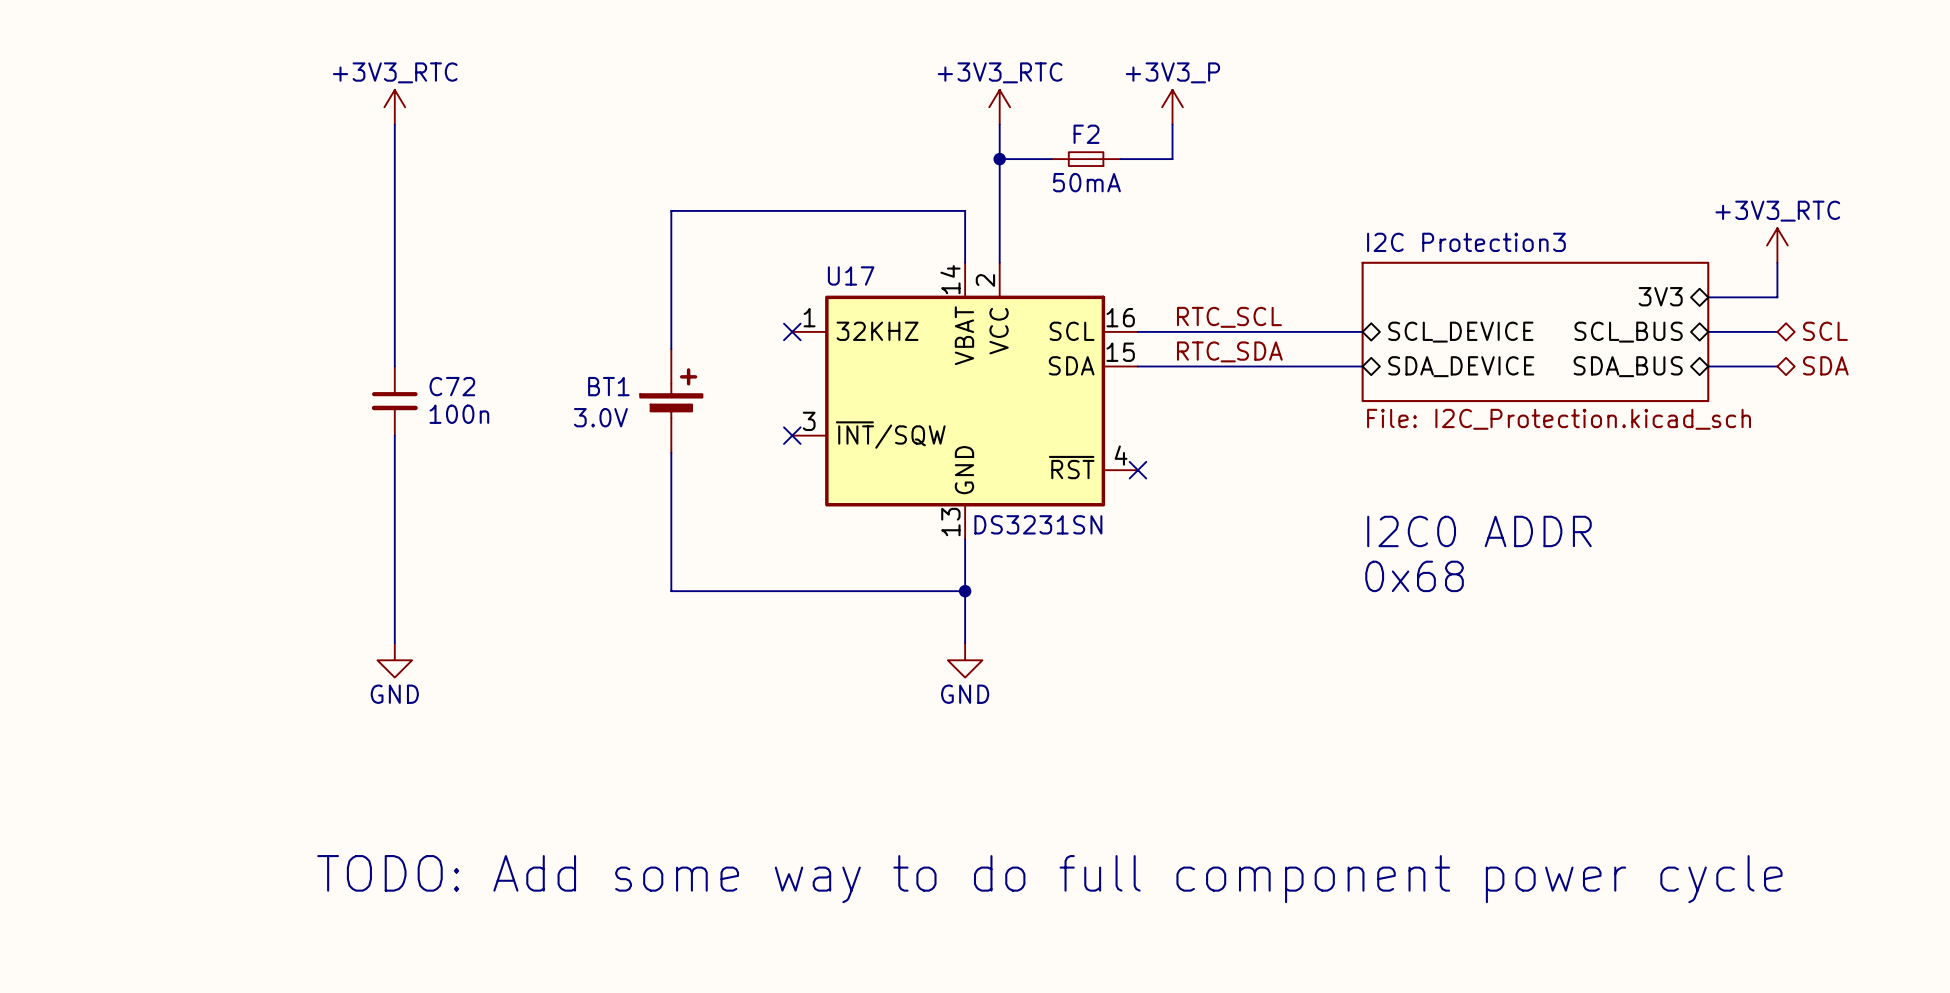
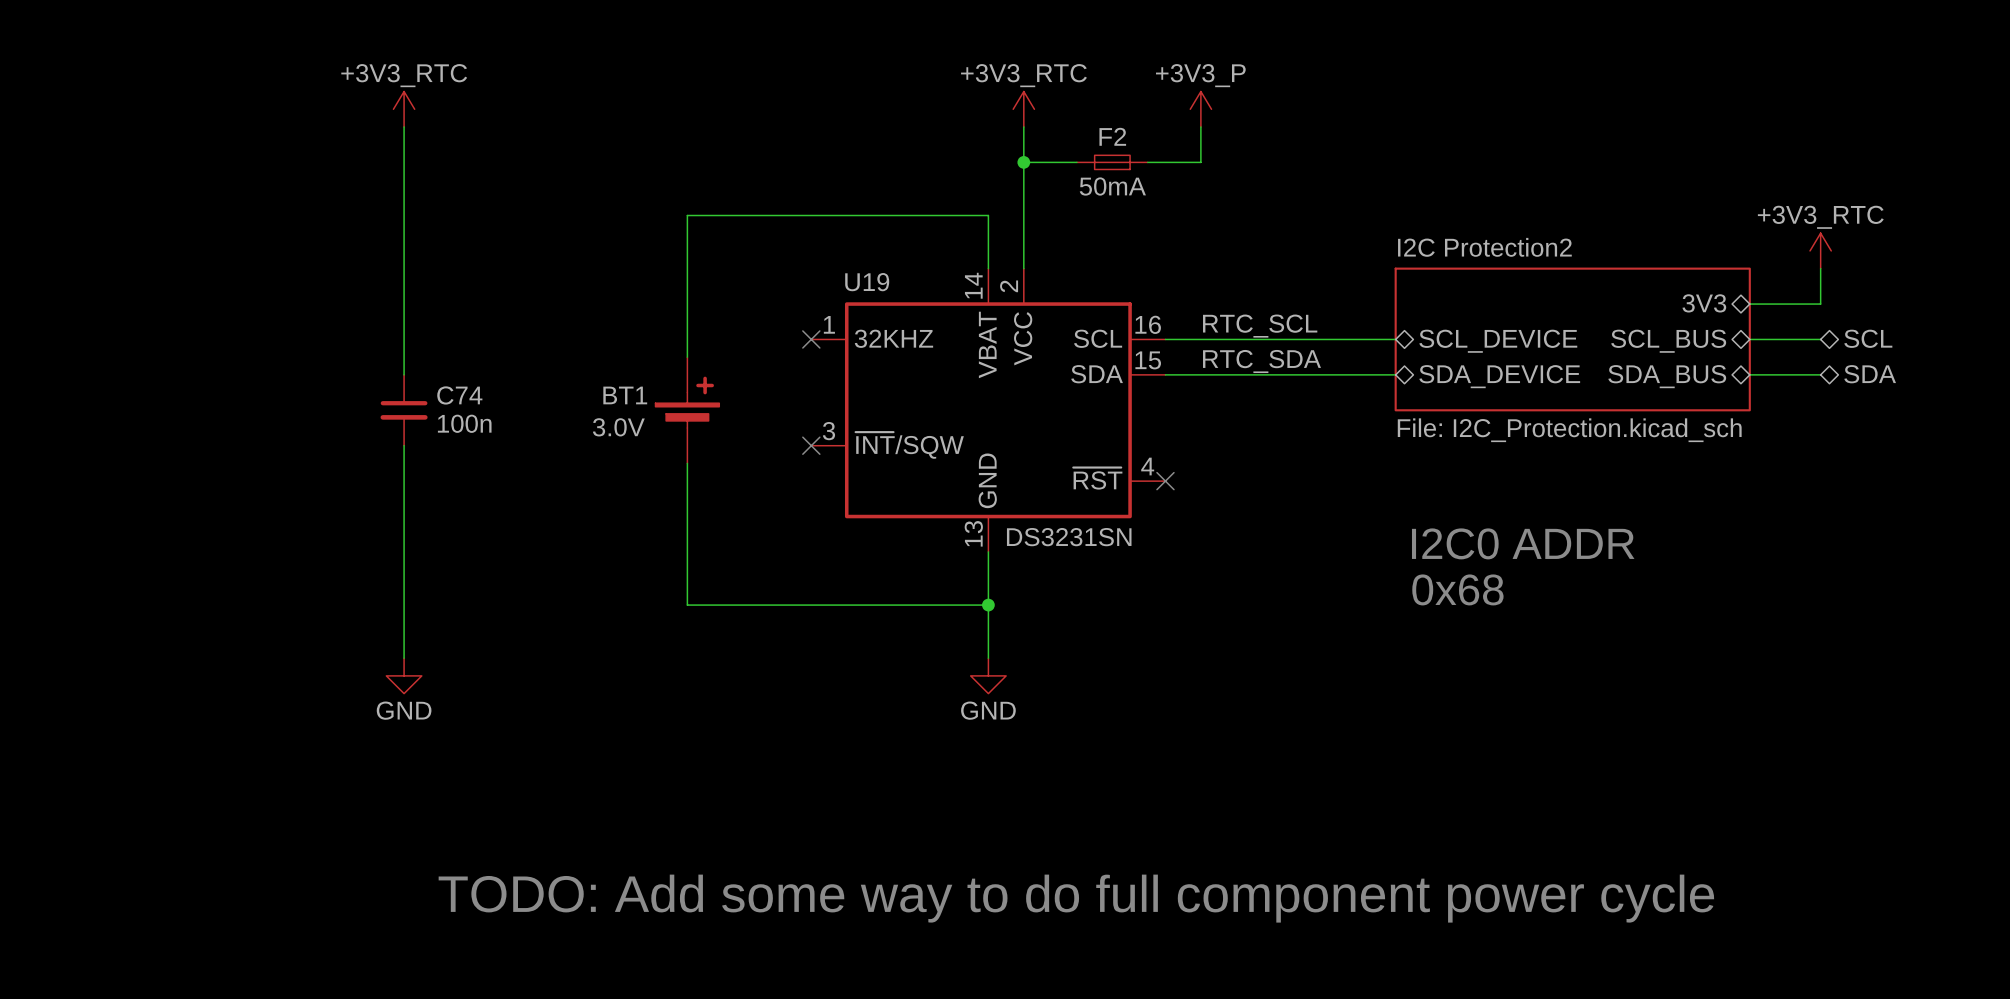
sheet I2C Protection3 name: I2C Protection3 (1466, 242) -> I2C Protection2 (1484, 247)
U17 name: U17 (851, 275) -> U19 (867, 282)
C72 name: C72 (452, 386) -> C74 (459, 395)

